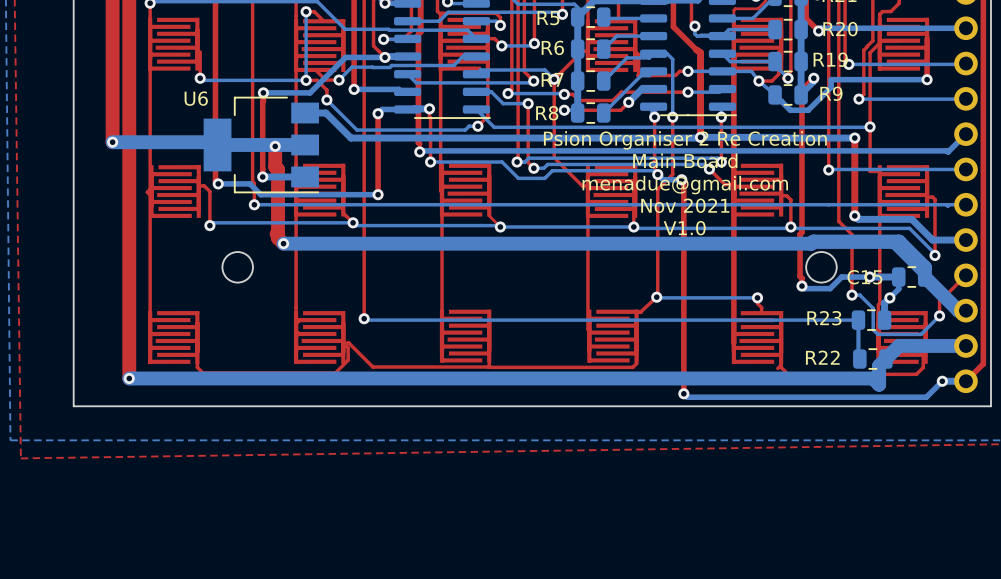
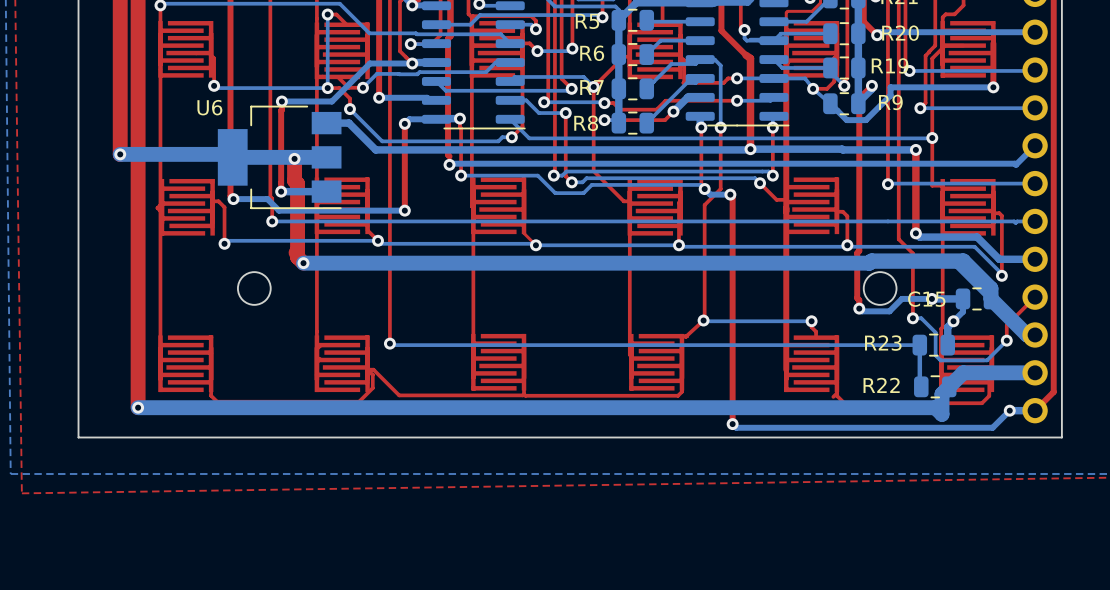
text: Psion Organiser 2 Re Creation (685, 140) -> none
text: Main Board (685, 160) -> none
text: menadue@gmail.com (685, 185) -> none
text: Nov 2021 (685, 205) -> none
text: V1.0 (684, 228) -> none

